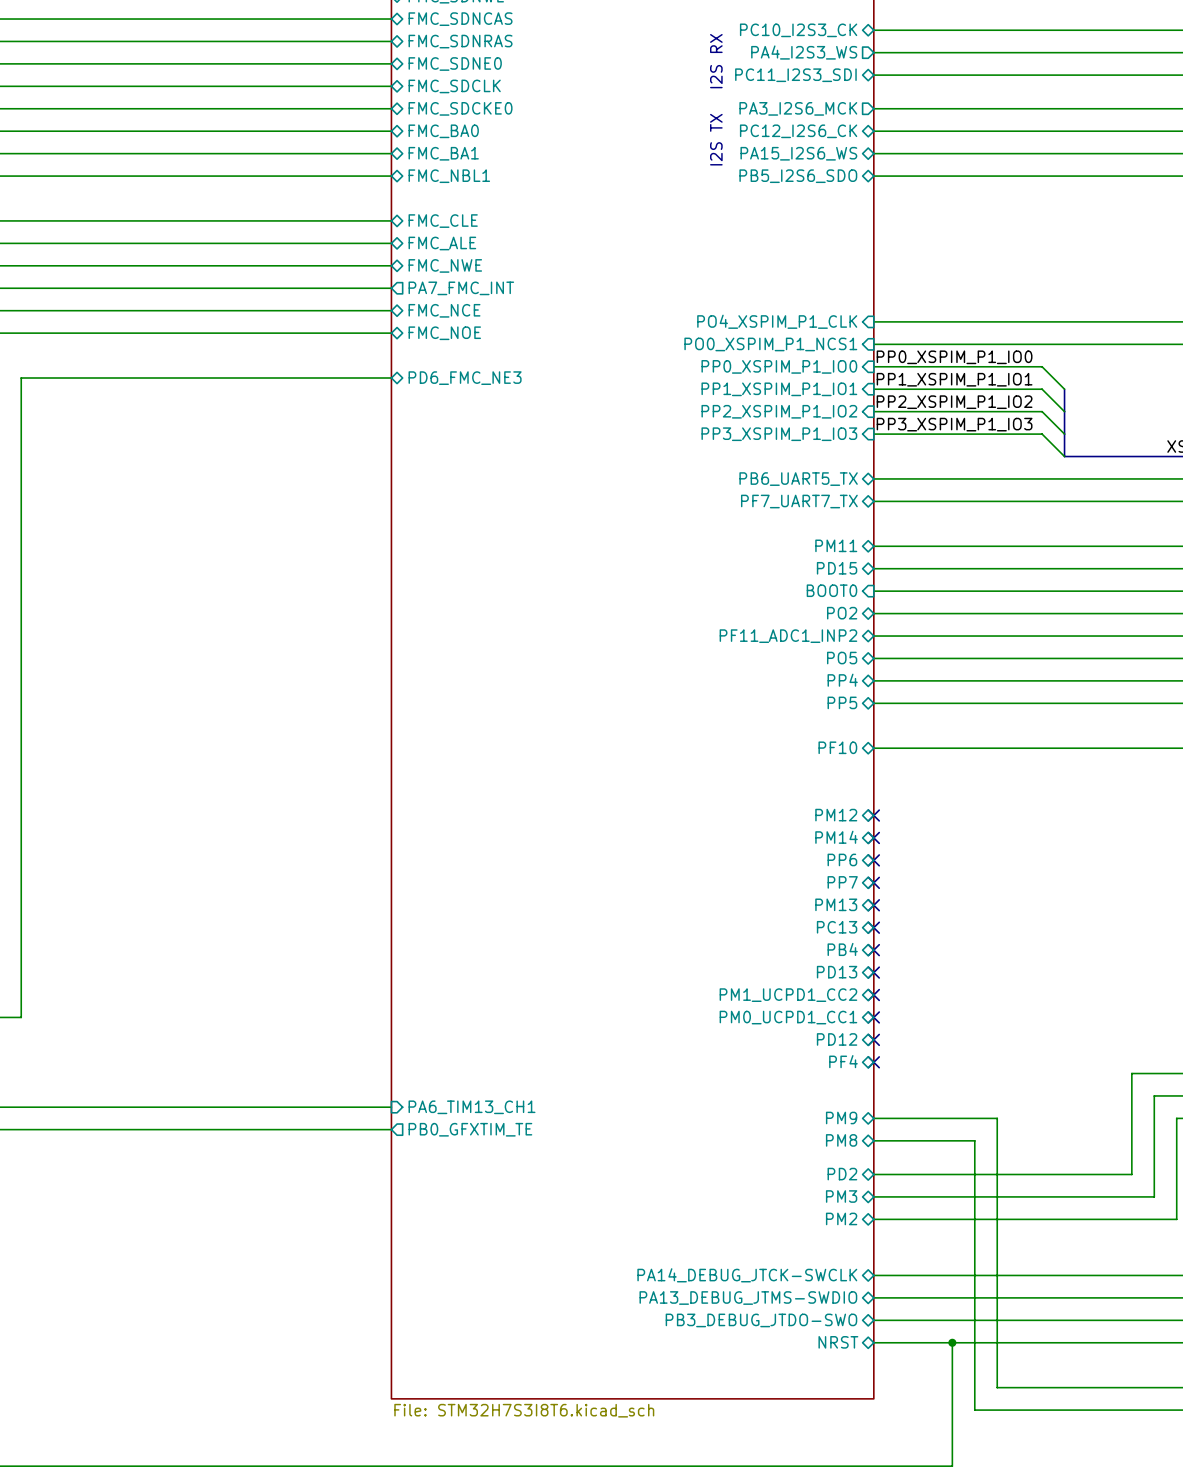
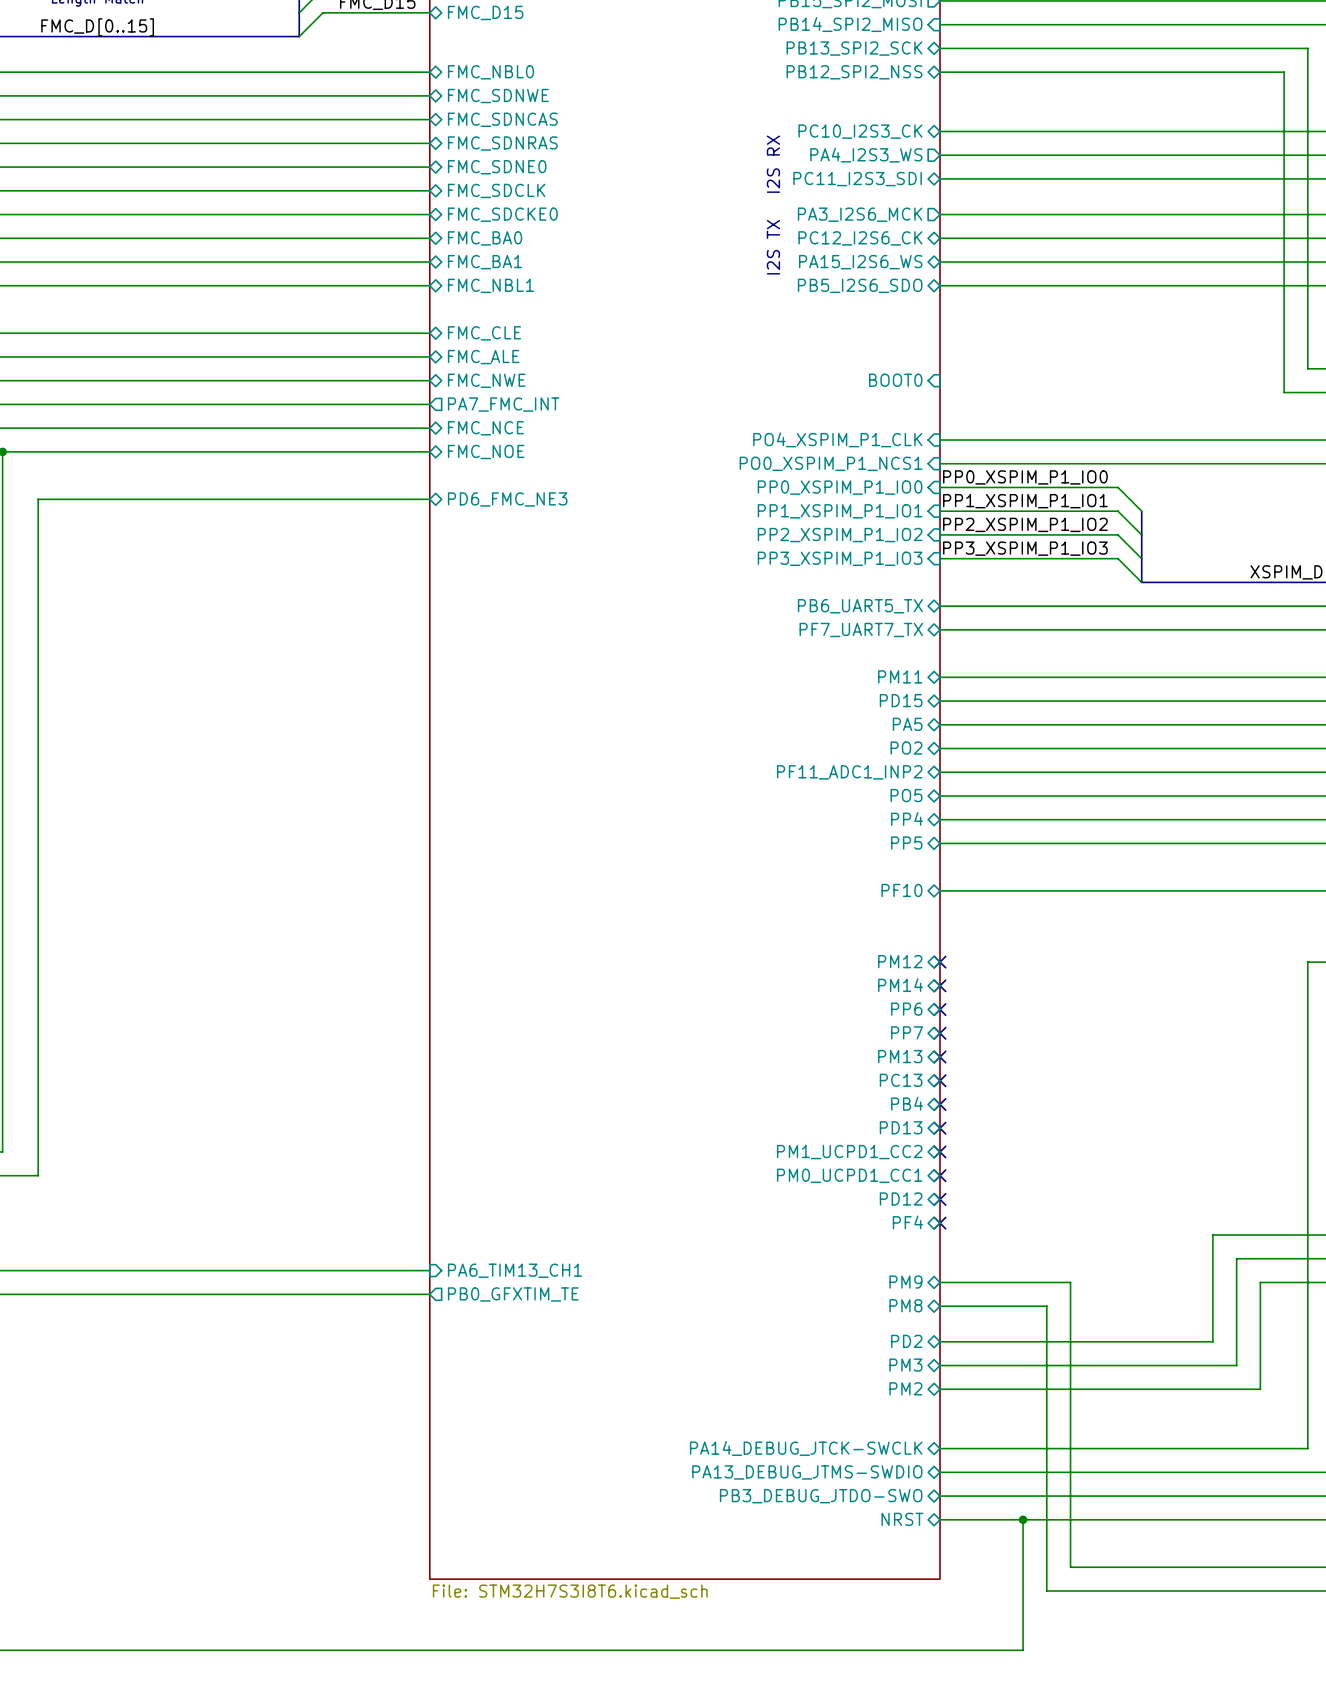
sheet pin: none -> BOOT0 (895, 380)
sheet pin shape: input (831, 590) -> bidirectional (907, 724)
sheet pin: BOOT0 (831, 590) -> PA5 (907, 724)

